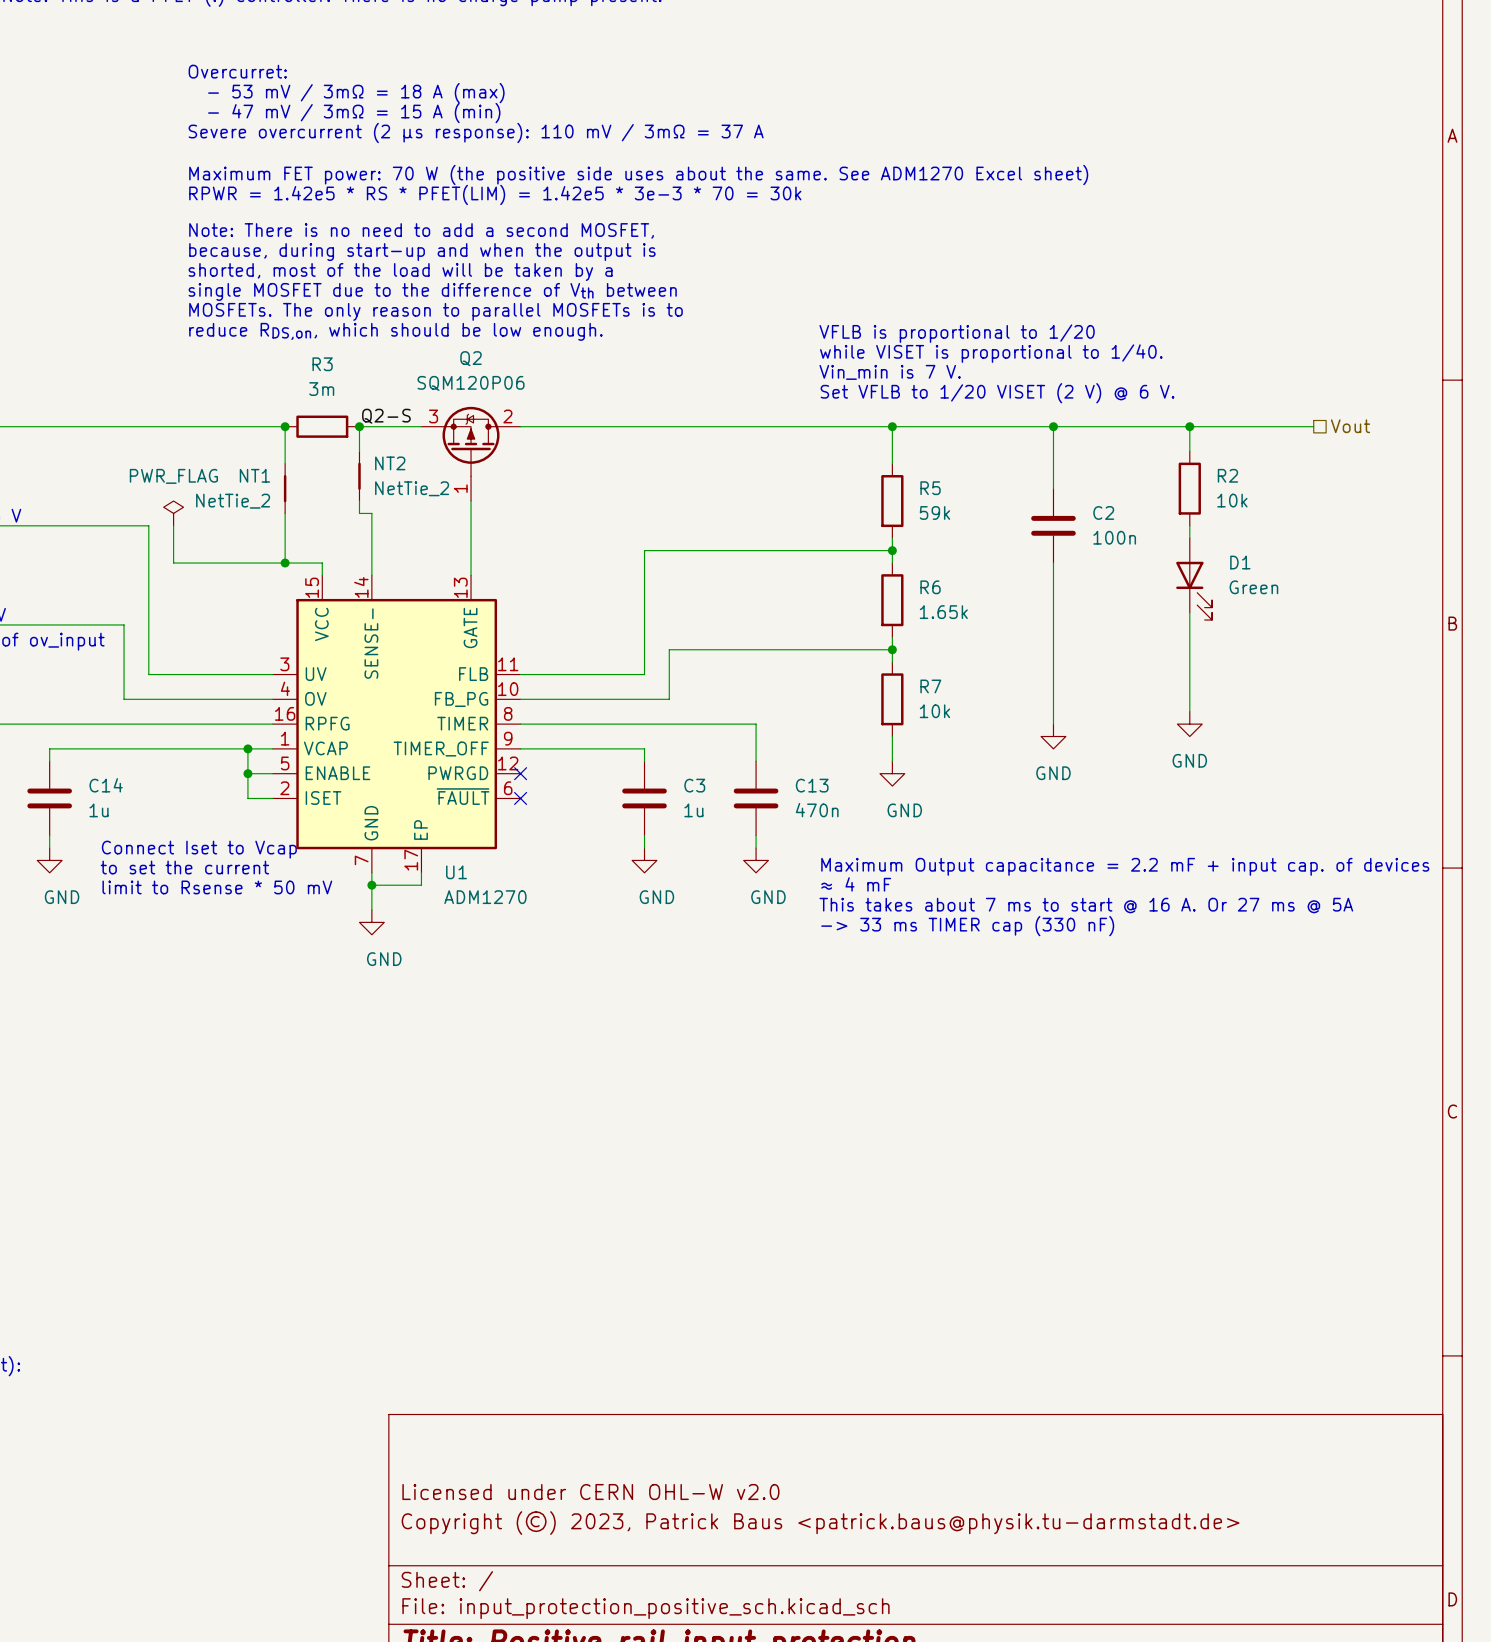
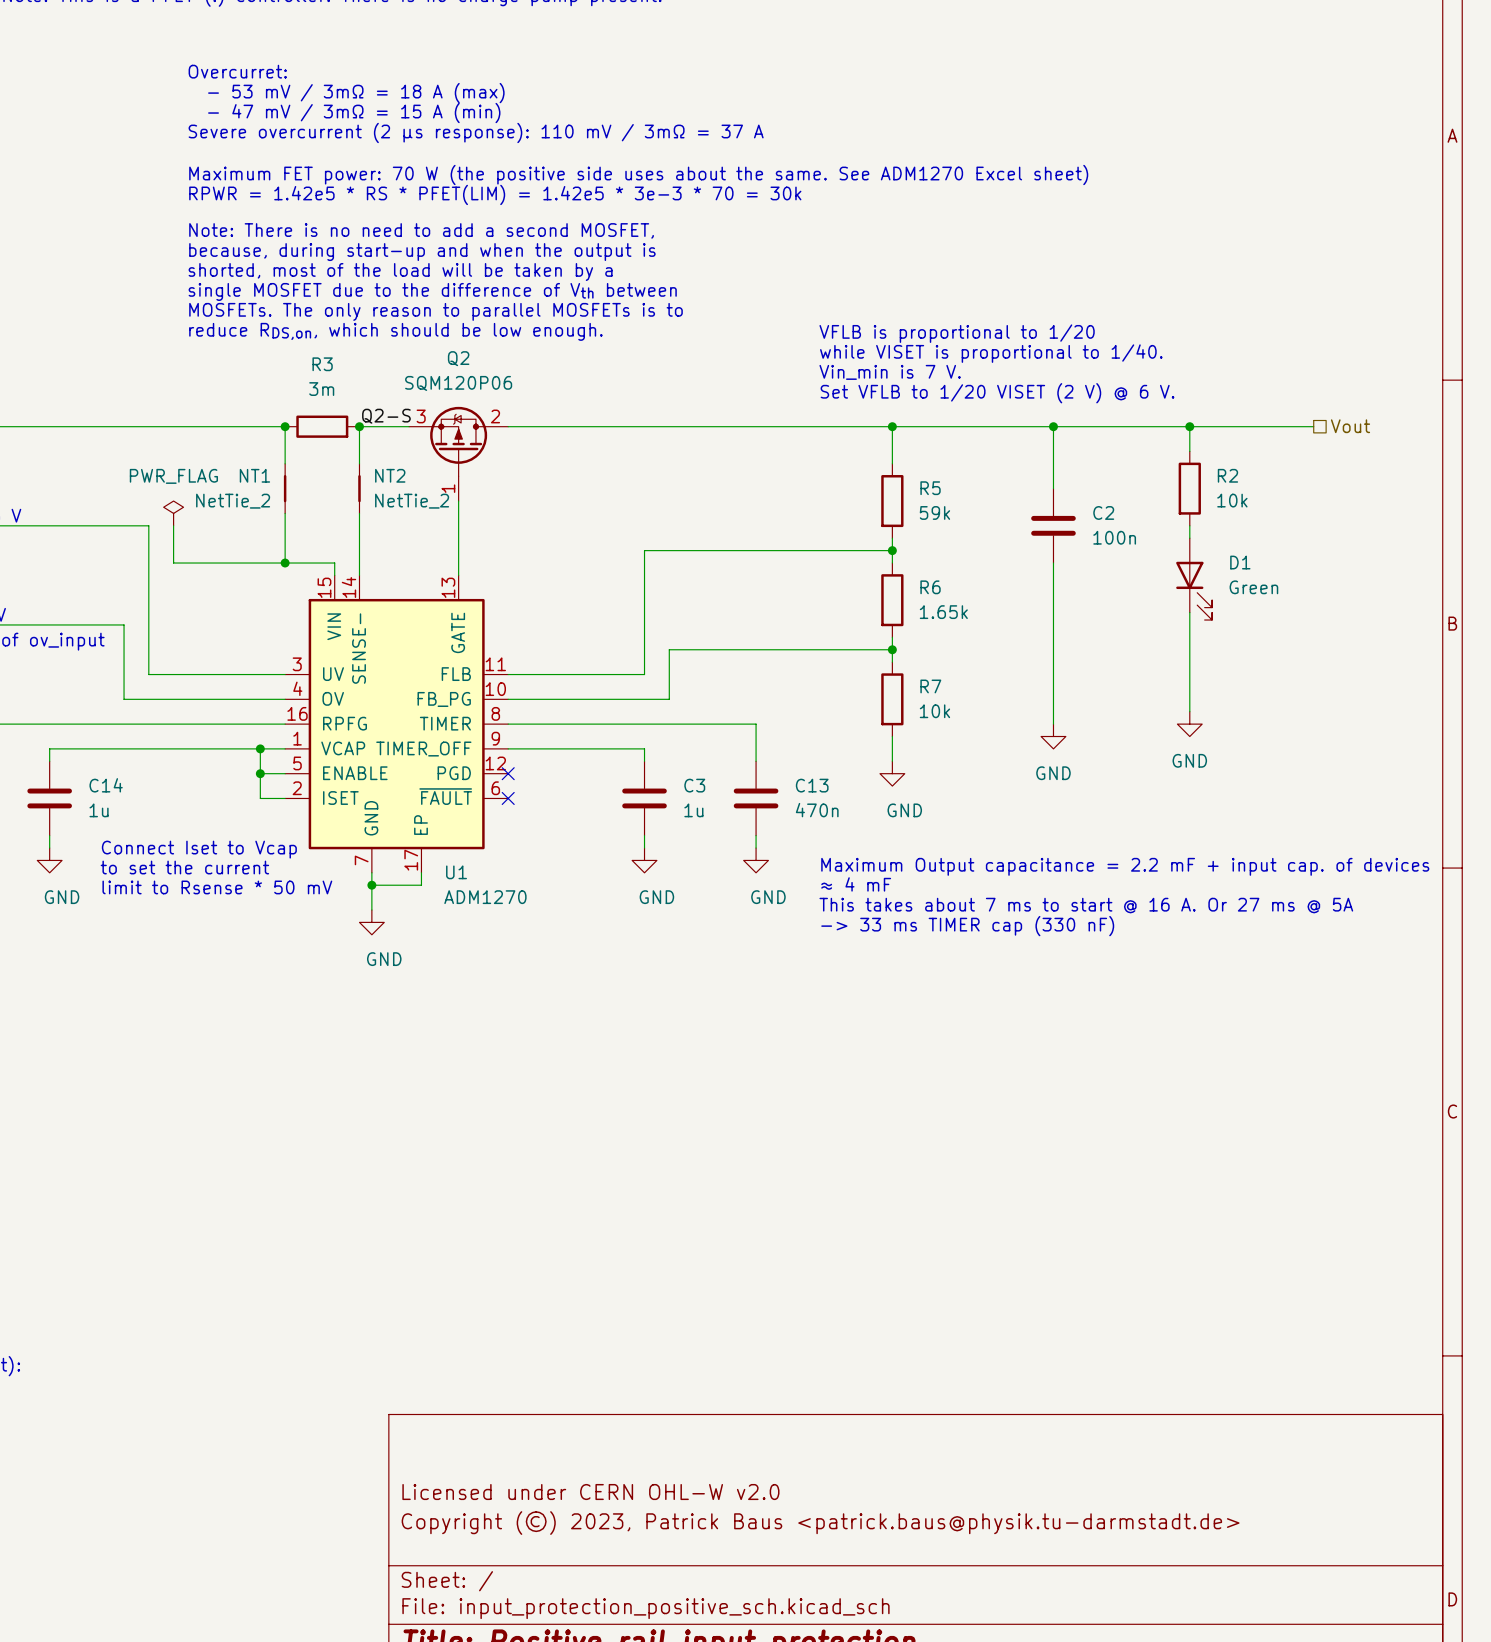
Q2 position: (471, 453) -> (458, 453)
NT2 position: (359, 476) -> (359, 488)
wire: (359, 501) (359, 513) (371, 513) (371, 575) -> none
wire: (471, 501) (471, 575) -> (458, 501) (458, 575)
wire: none -> (359, 513) (359, 575)
wire: (322, 563) (322, 575) -> (322, 563) (334, 563) (334, 575)
U1 symbol: [272, 575, 521, 873] -> [285, 575, 509, 873]
wire: (247, 748) (247, 798) (260, 798) -> (260, 748) (260, 798)
junction position: (247, 748) -> (260, 748)
junction position: (247, 773) -> (260, 773)
no-connect mark position: (520, 773) -> (508, 773)
no-connect mark position: (520, 798) -> (508, 798)

